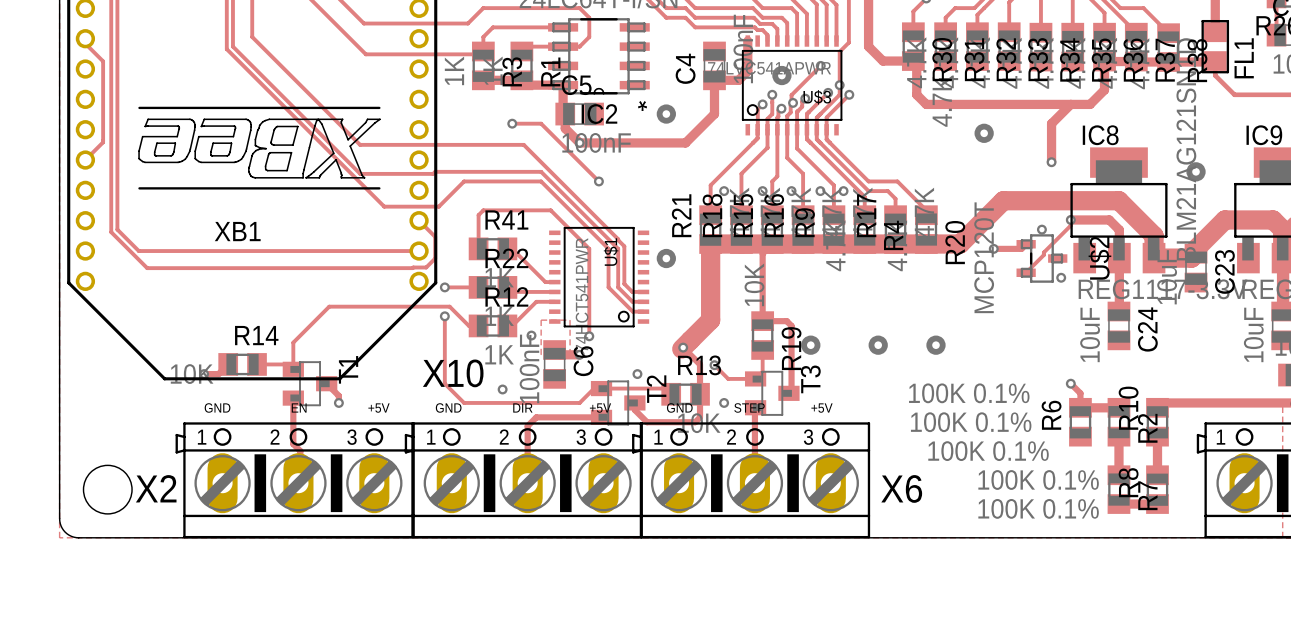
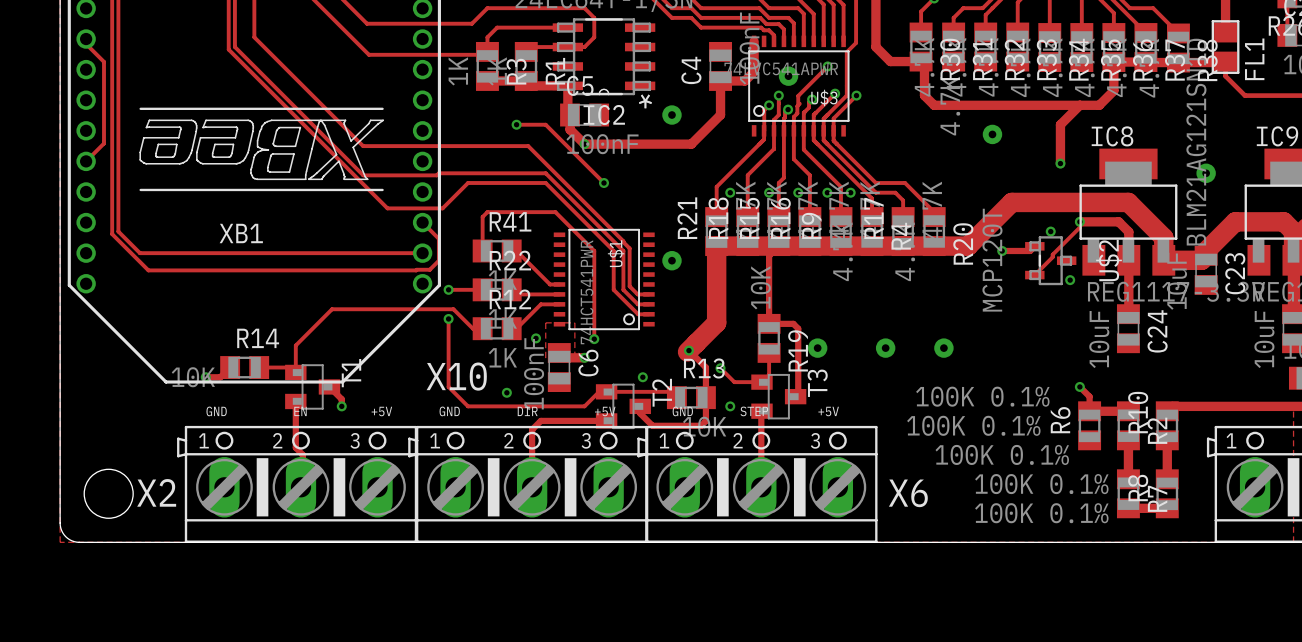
via: (839, 85) -> none
via: (793, 102) -> none

